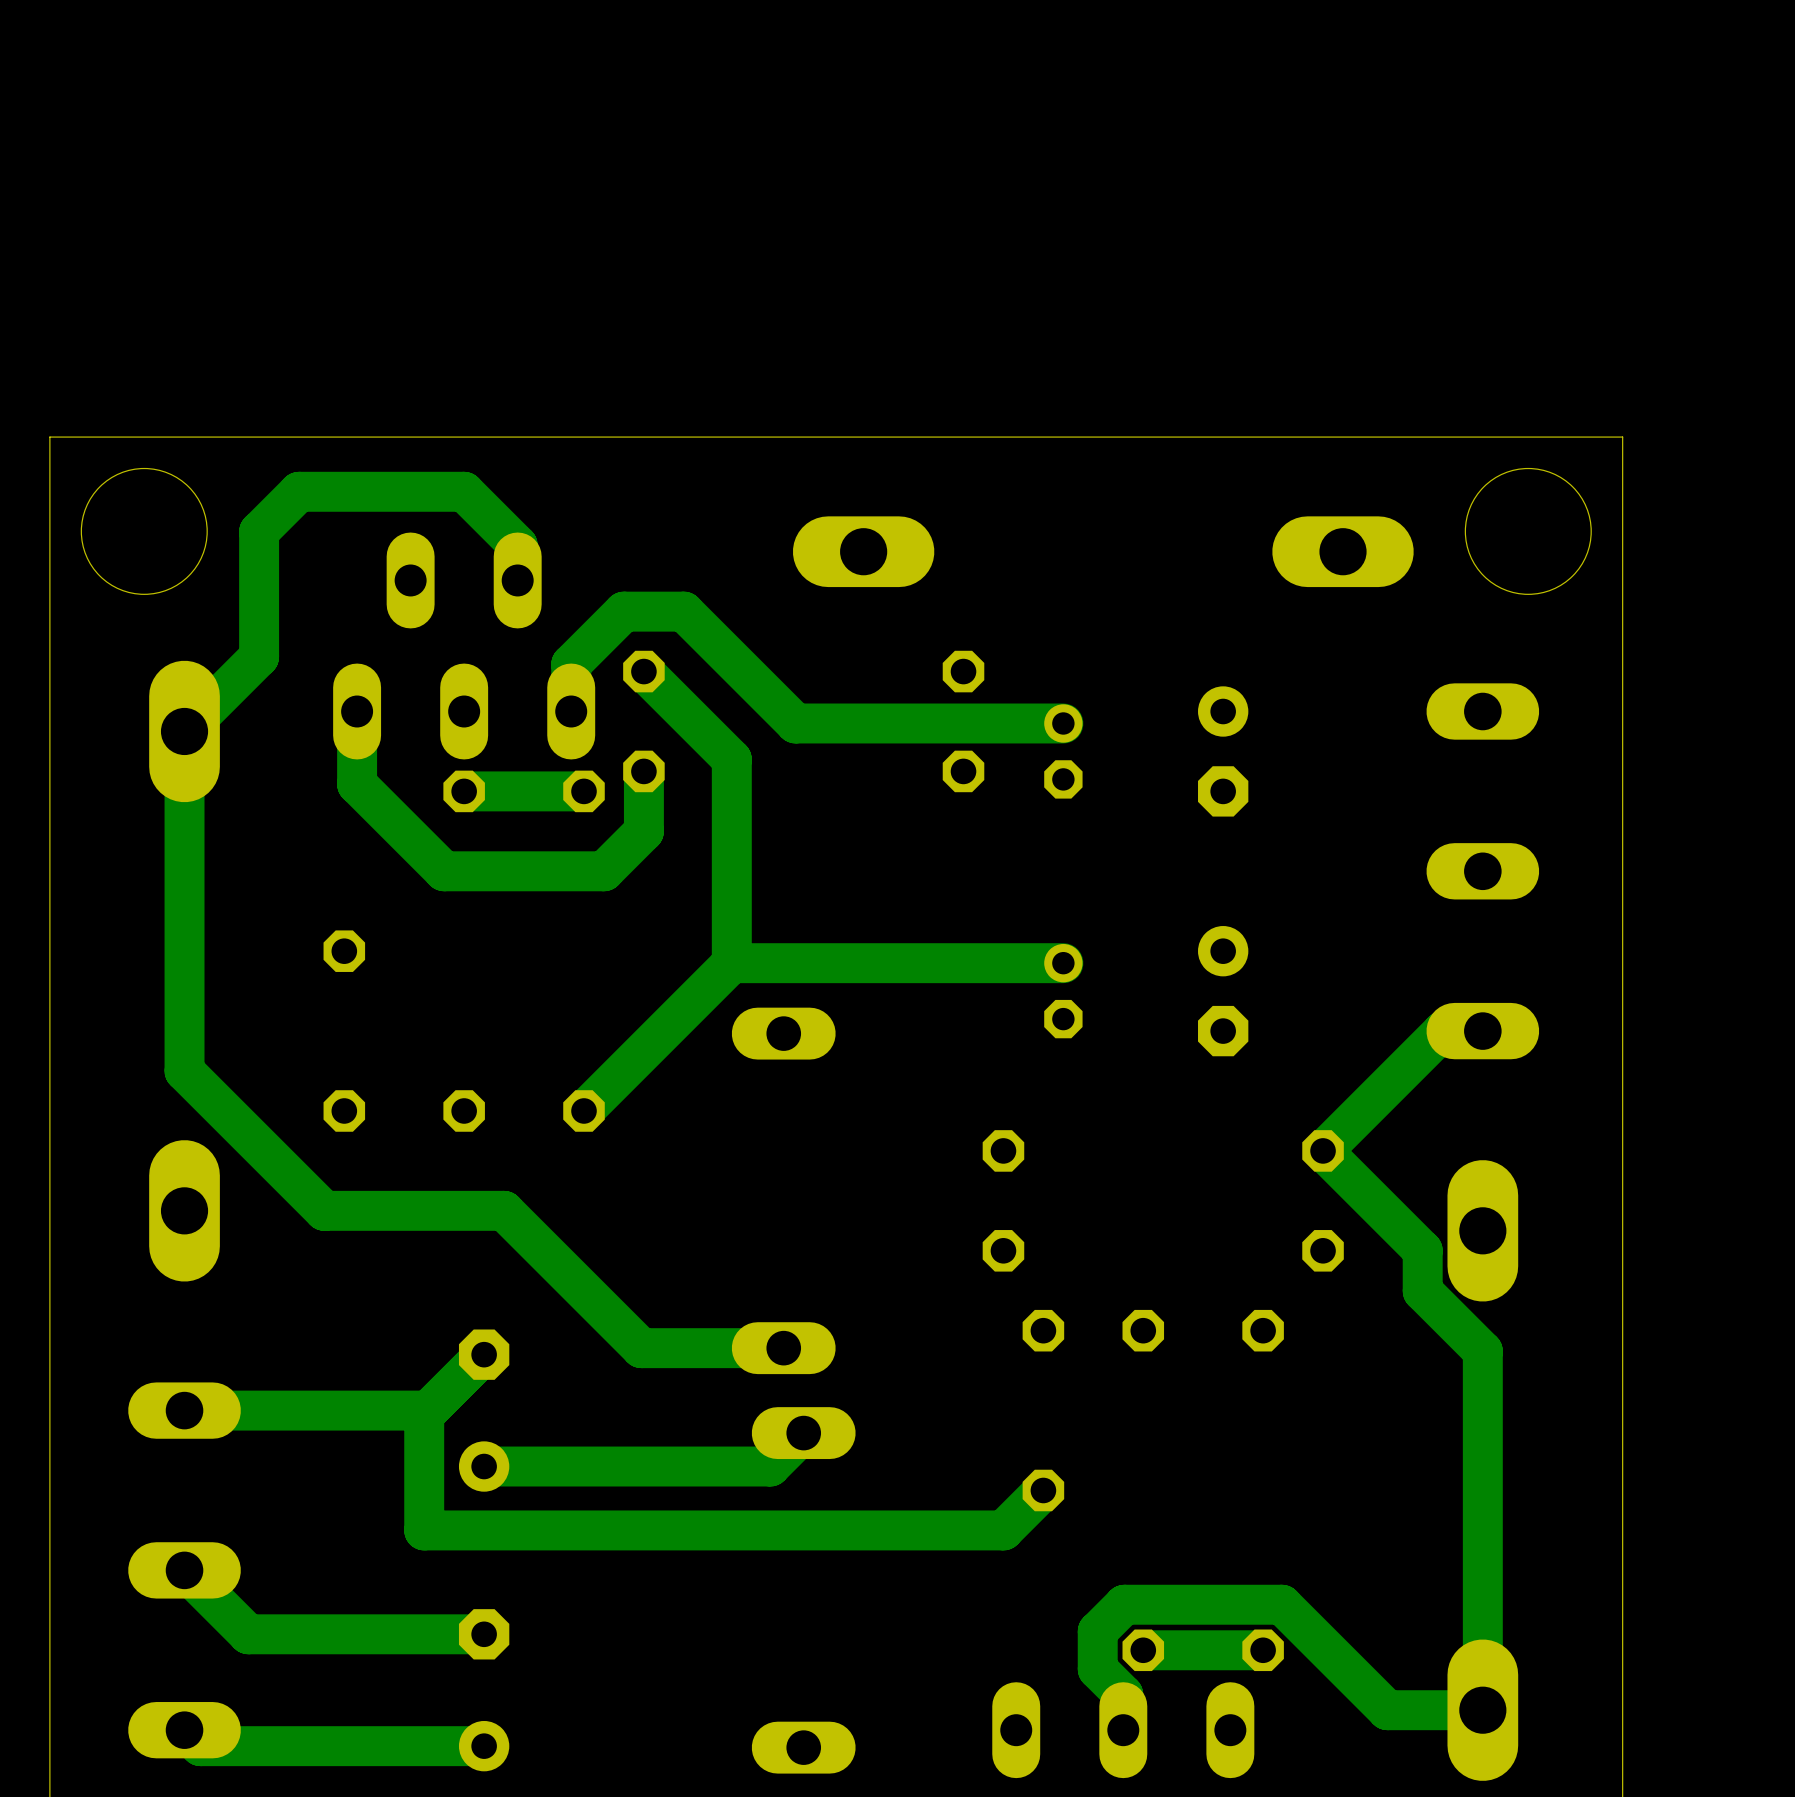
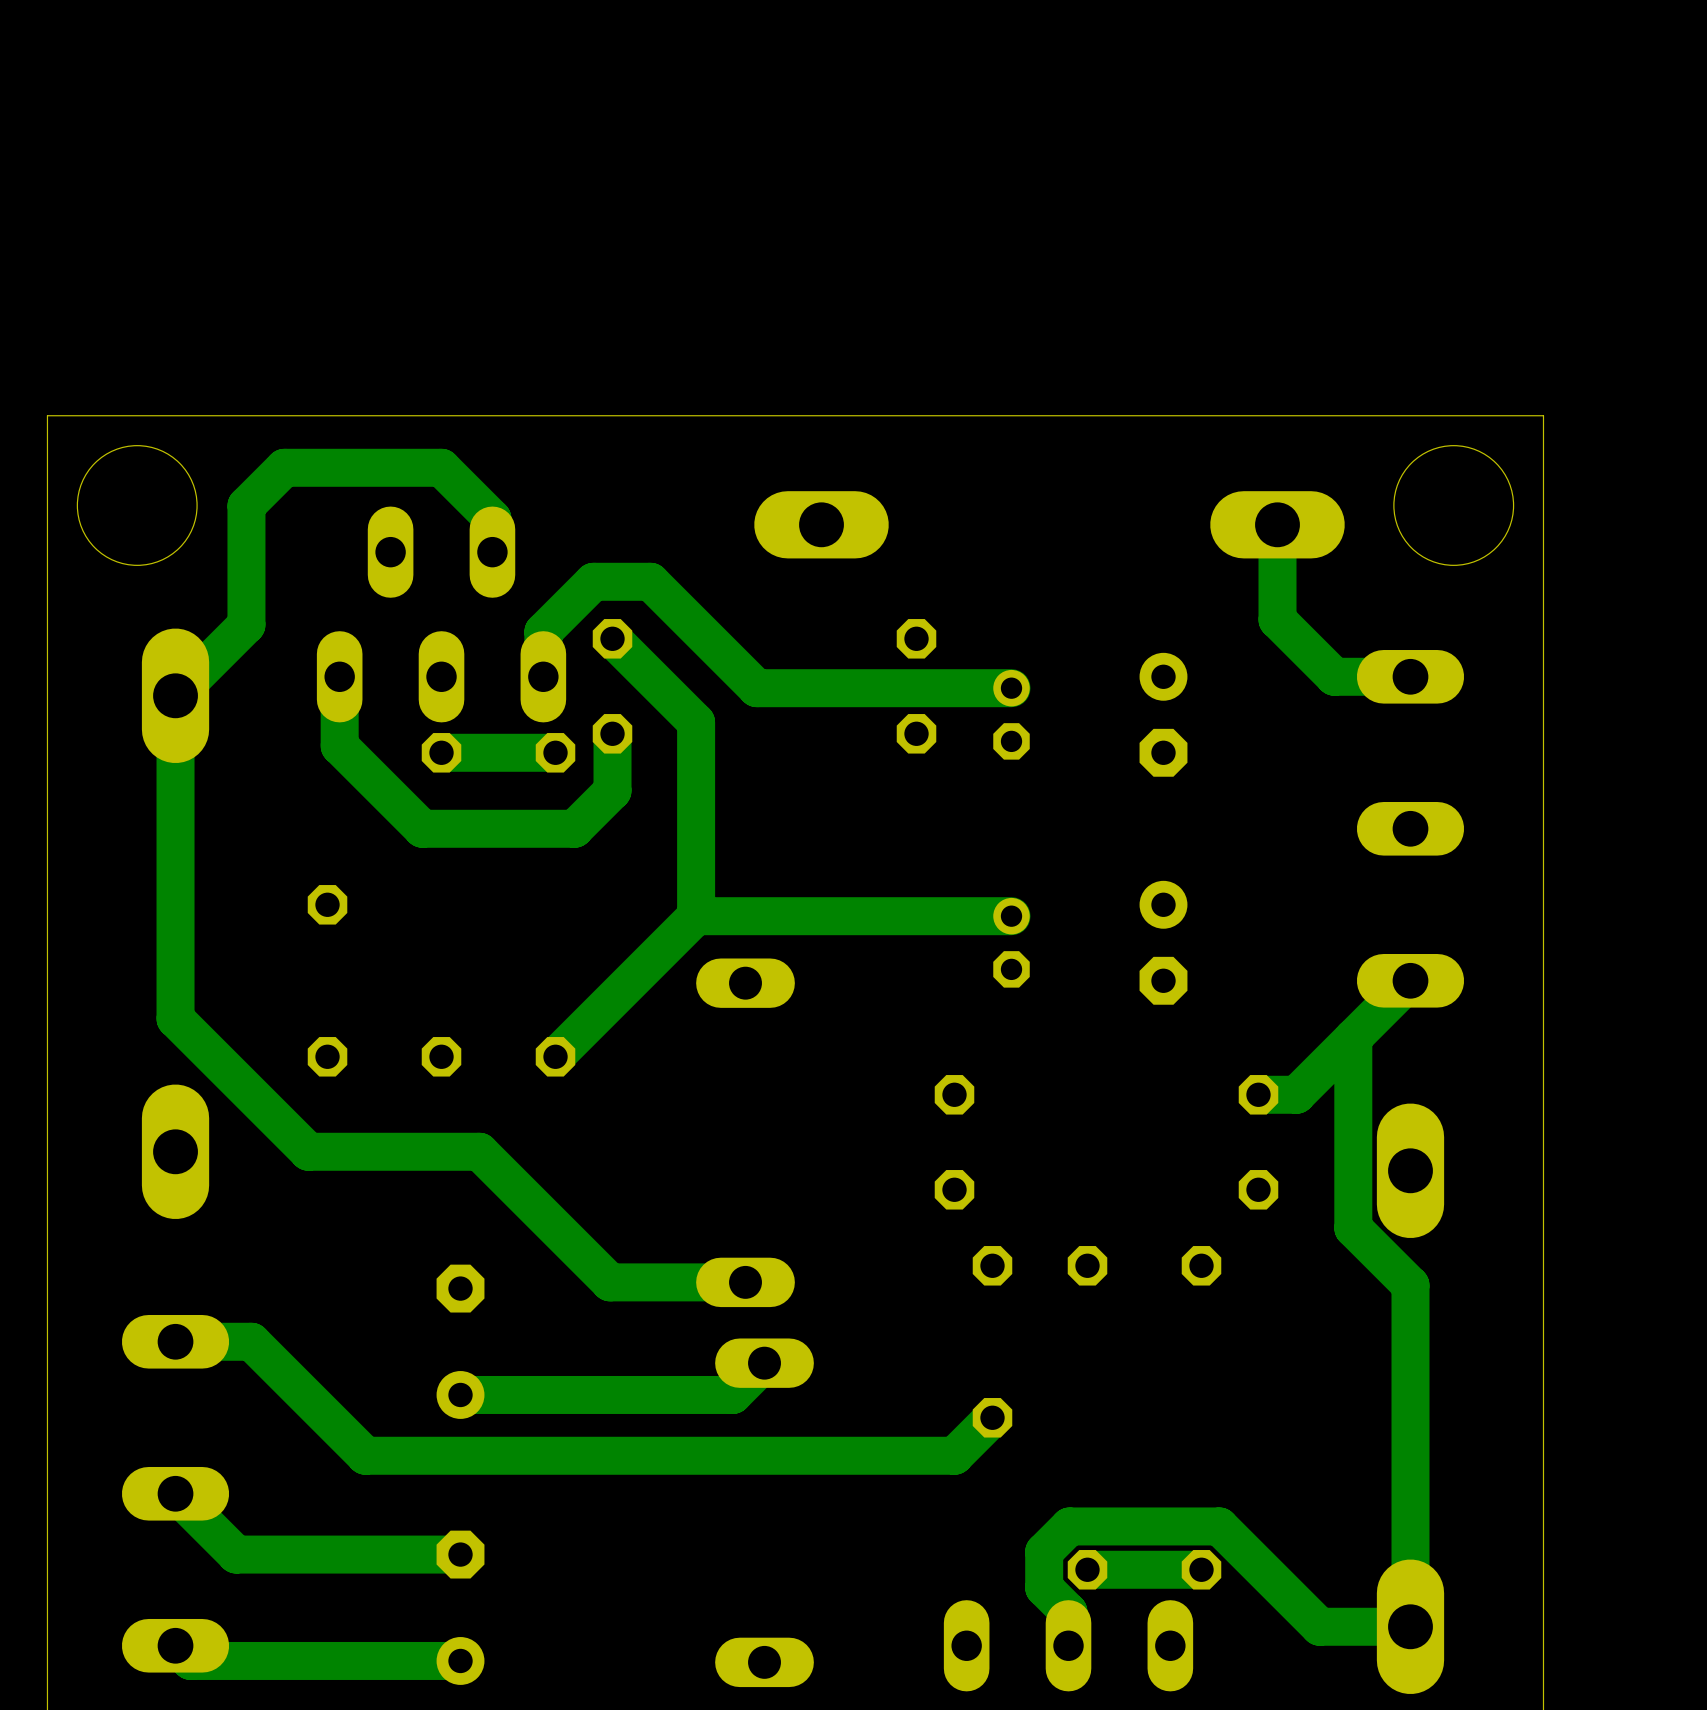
track: none -> (1277, 524) (1277, 619) (1334, 676) (1410, 676)
track: (1482, 1031) (1442, 1031) (1323, 1150) (1422, 1250) -> (1353, 1037) (1353, 1189)
track: none -> (1410, 980) (1296, 1094) (1258, 1094)
track: (484, 1354) (424, 1414) (424, 1530) -> none
track: (428, 1410) (264, 1410) -> (403, 1455) (365, 1455) (251, 1341)

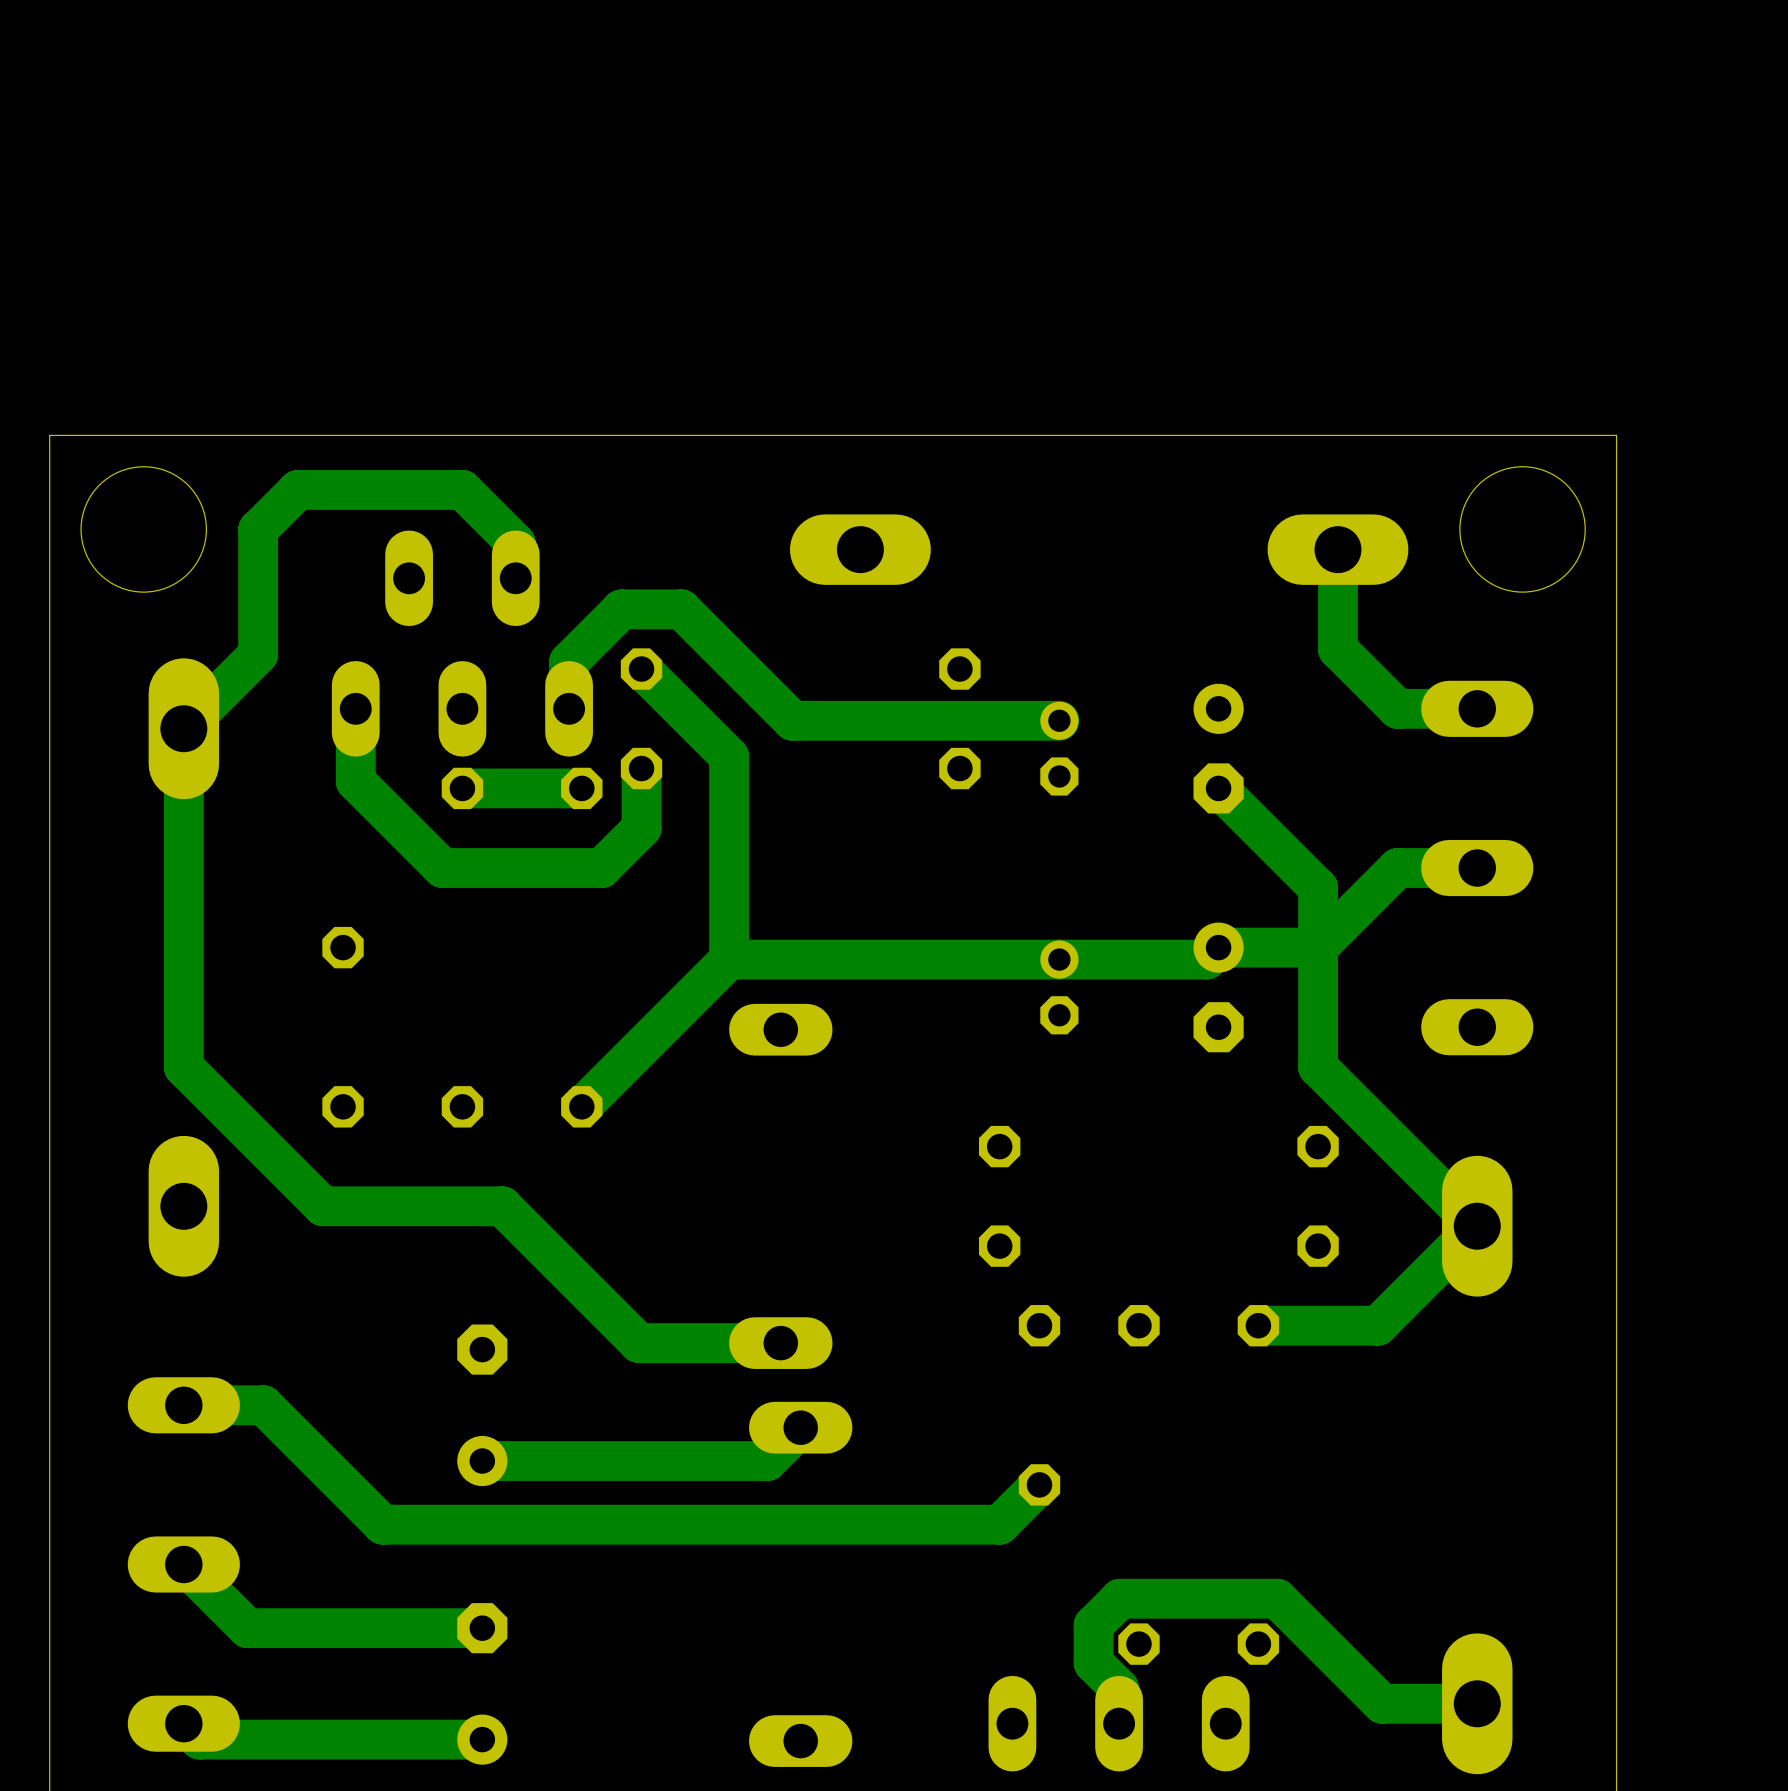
track: none -> (1218, 788) (1318, 887) (1318, 1067) (1477, 1226) (1377, 1325) (1258, 1325)
track: none -> (1477, 868) (1397, 868) (1318, 947) (1218, 947) (1206, 959) (1059, 959)
track: (1410, 980) (1296, 1094) (1258, 1094) -> none
track: (1353, 1037) (1353, 1228) (1410, 1285) (1410, 1626) -> none
track: (1201, 1569) (1087, 1569) -> none

